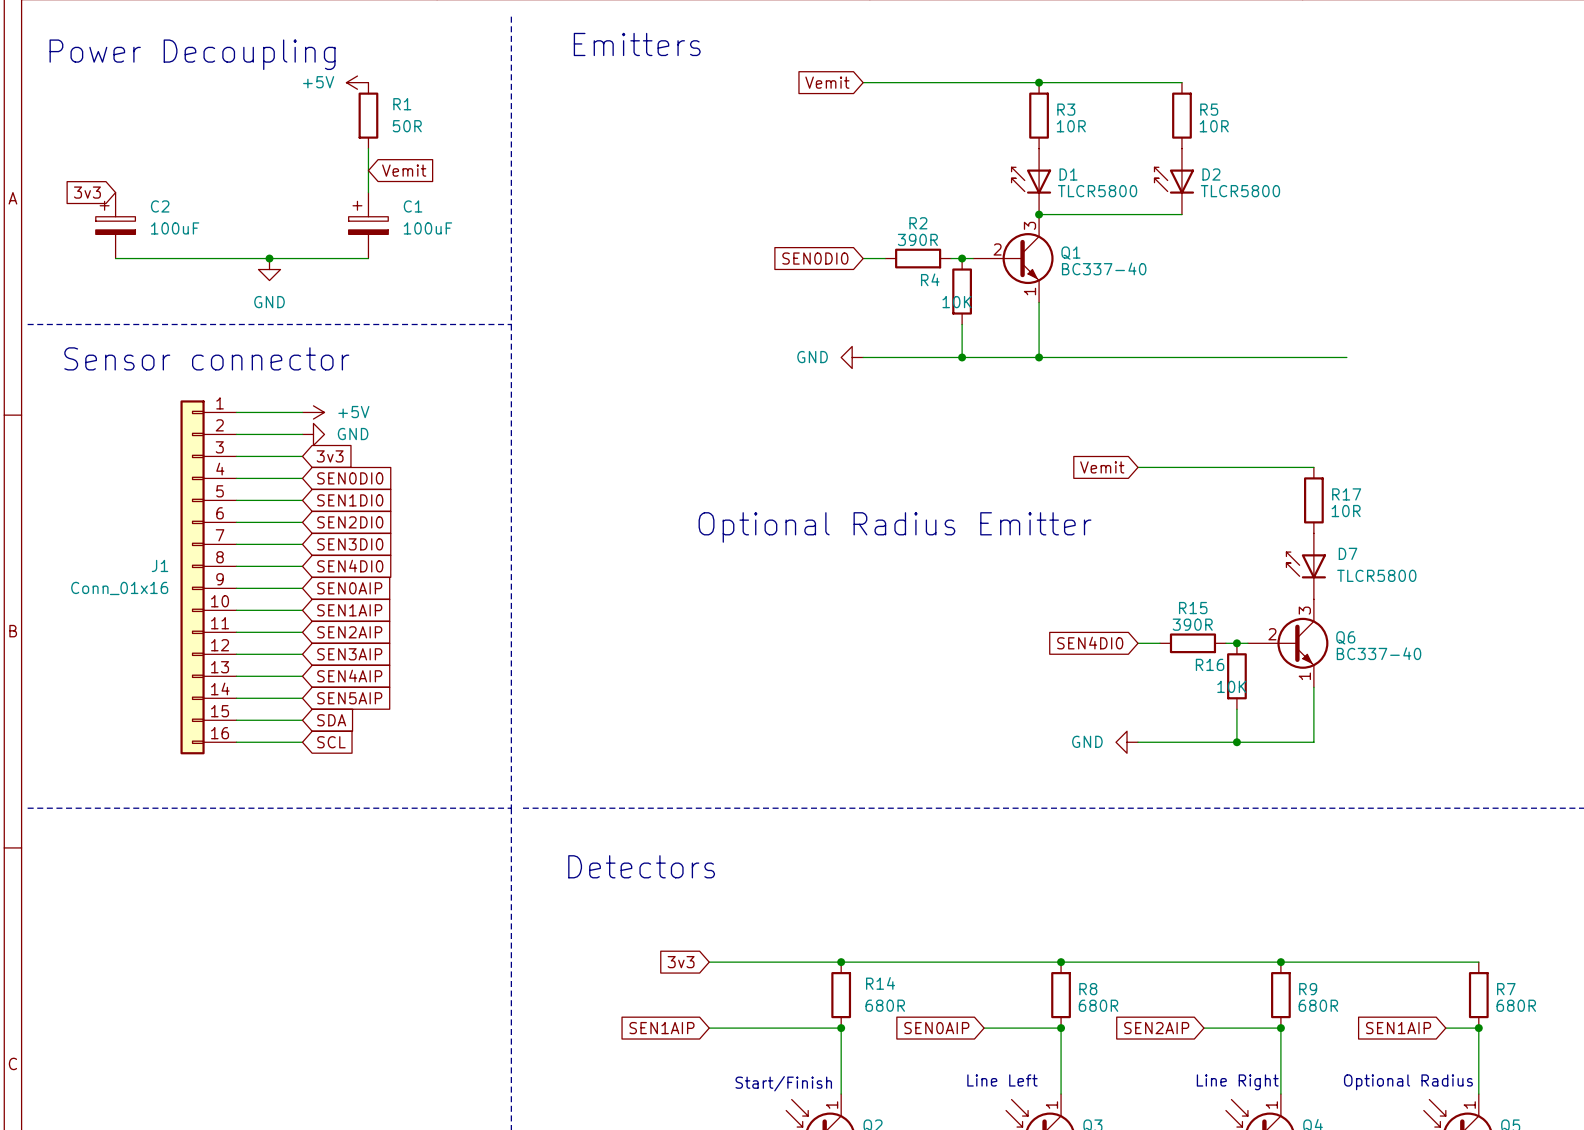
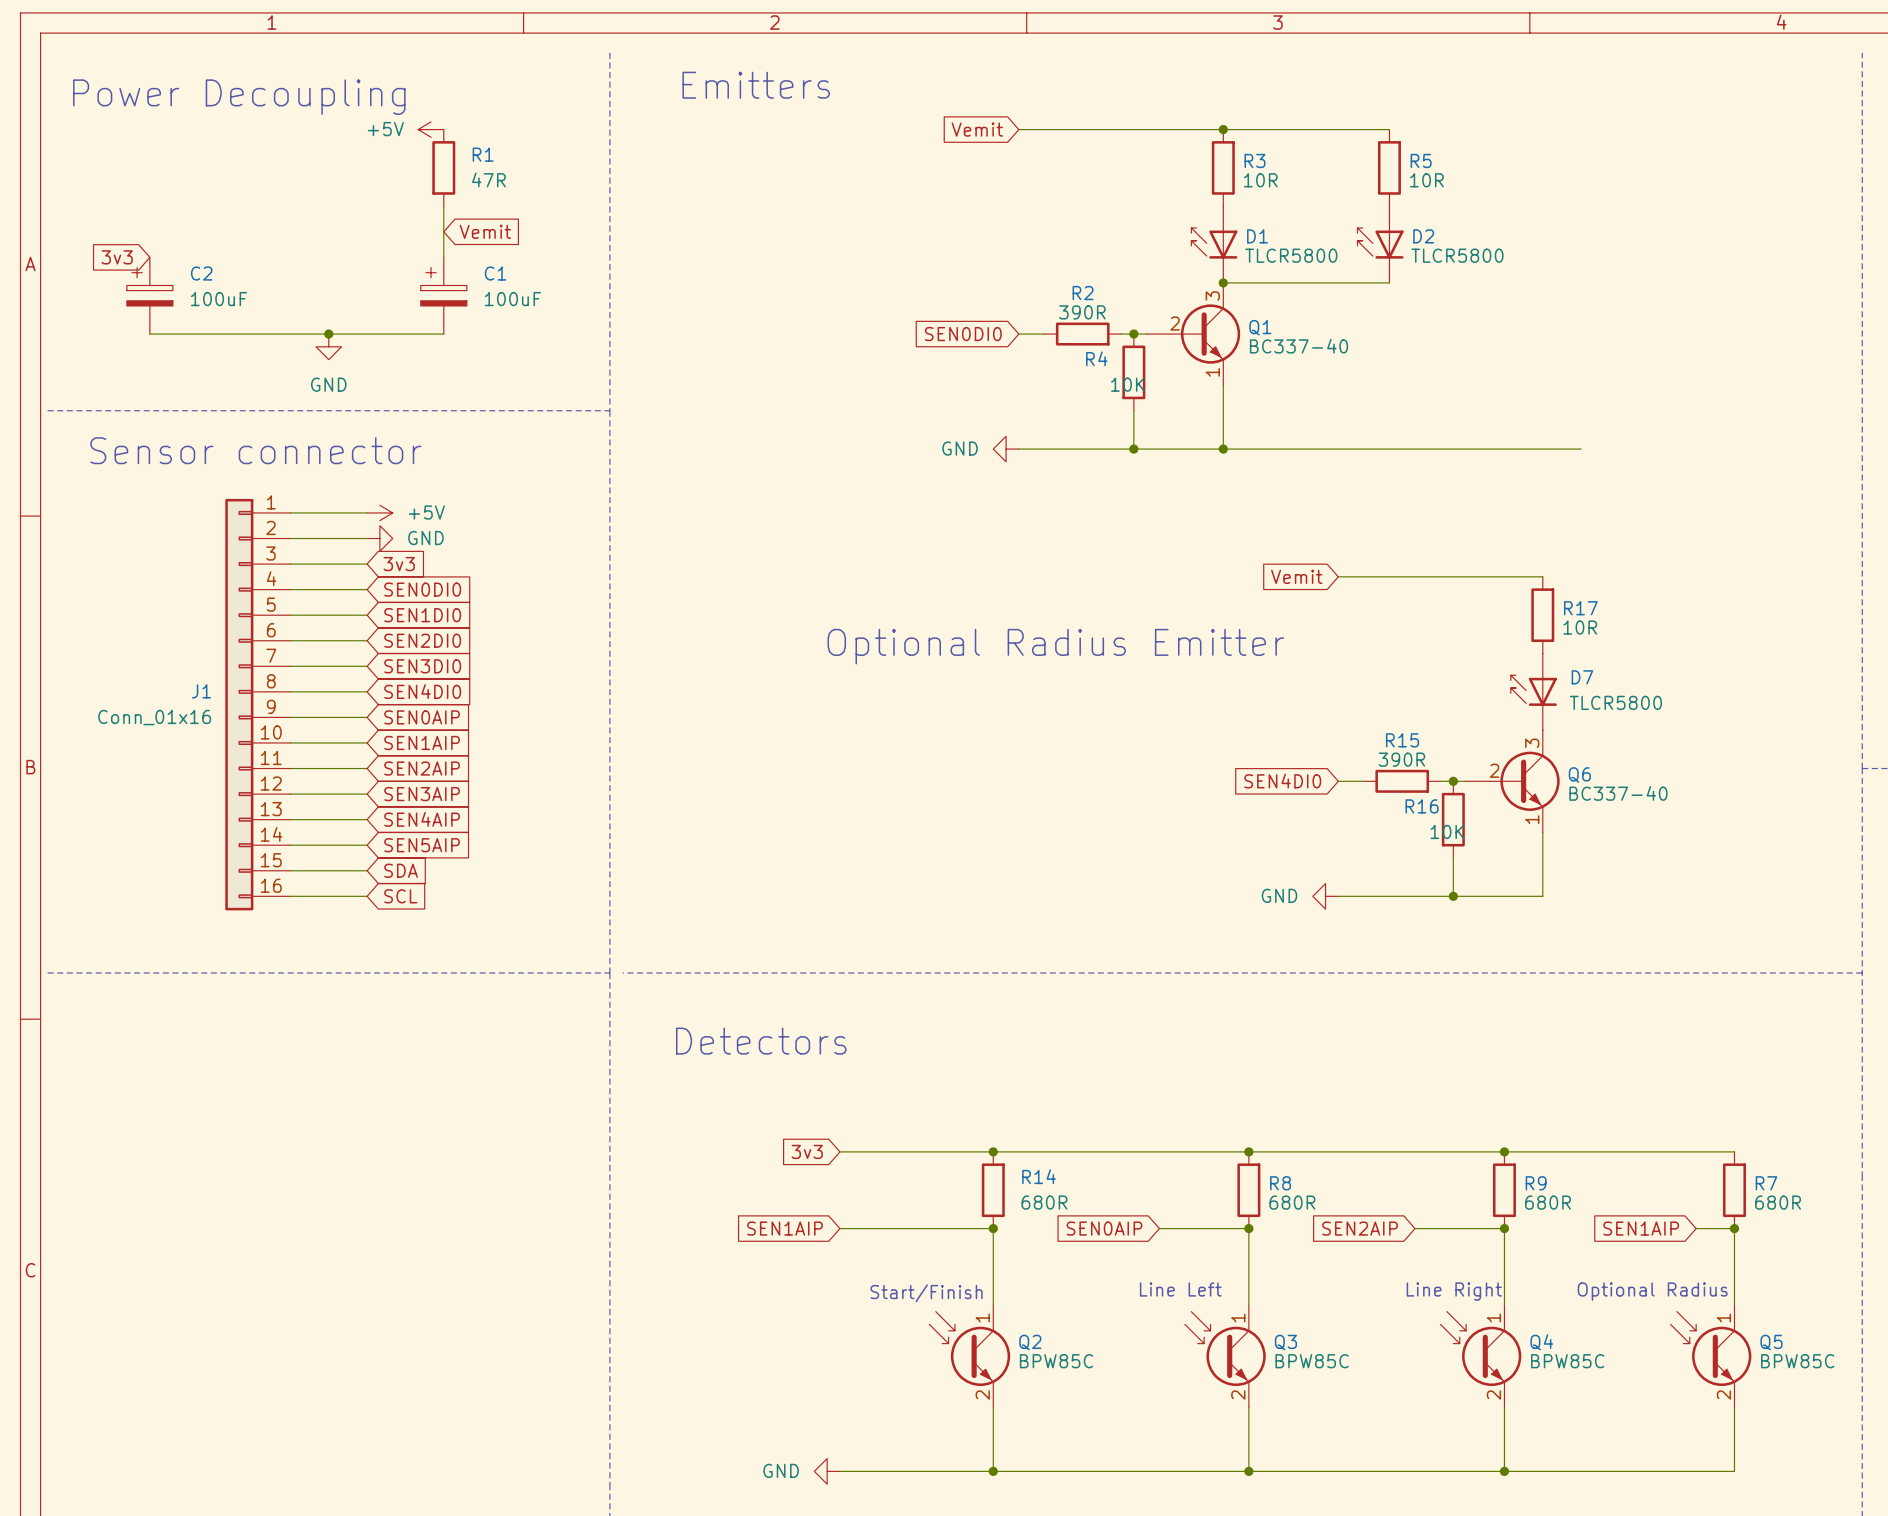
R1 value: 50R (407, 126) -> 47R (488, 179)

